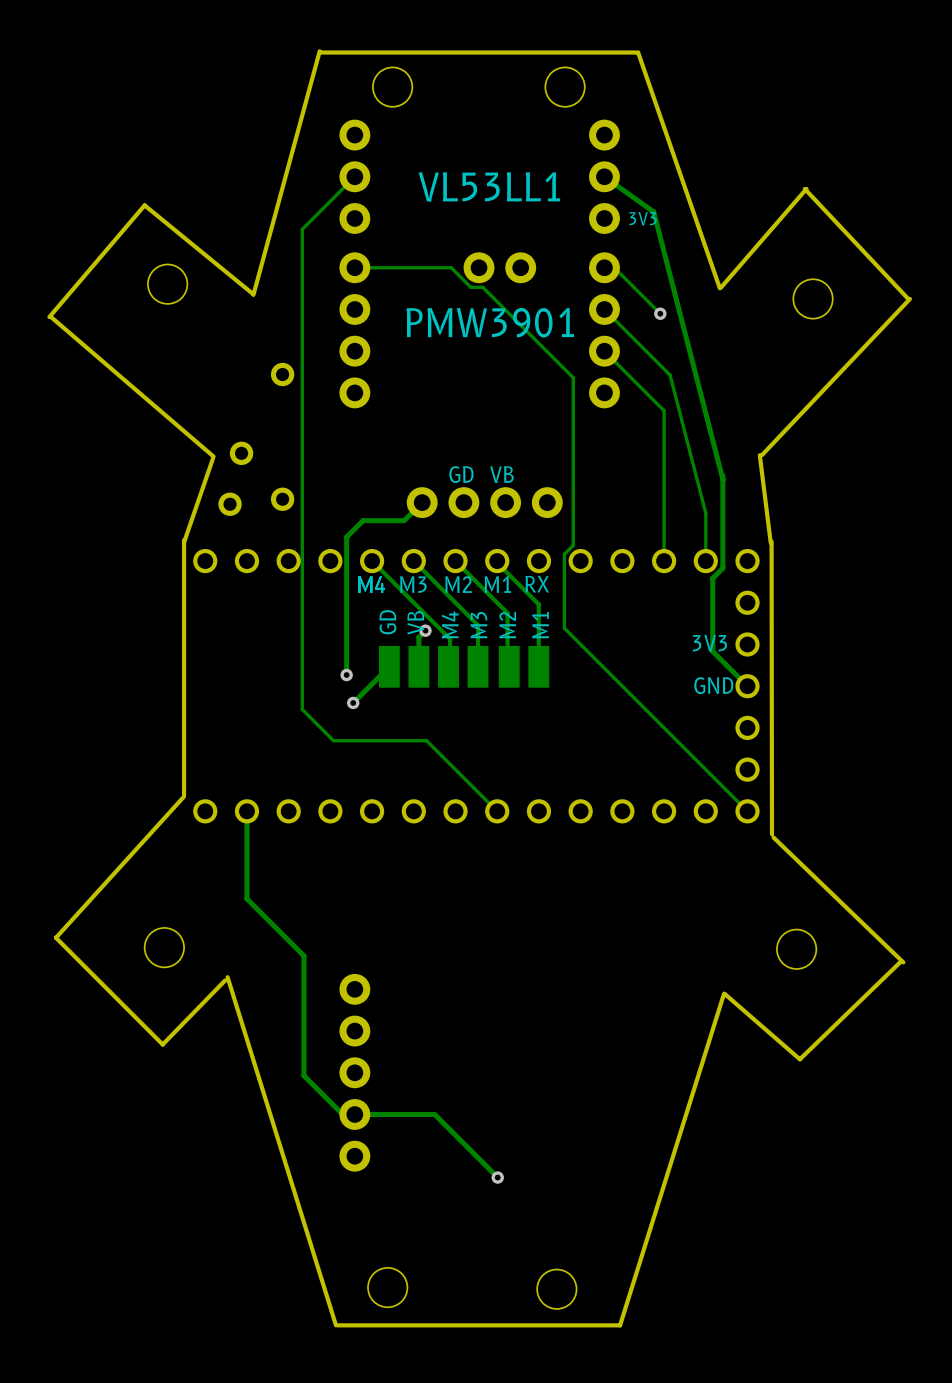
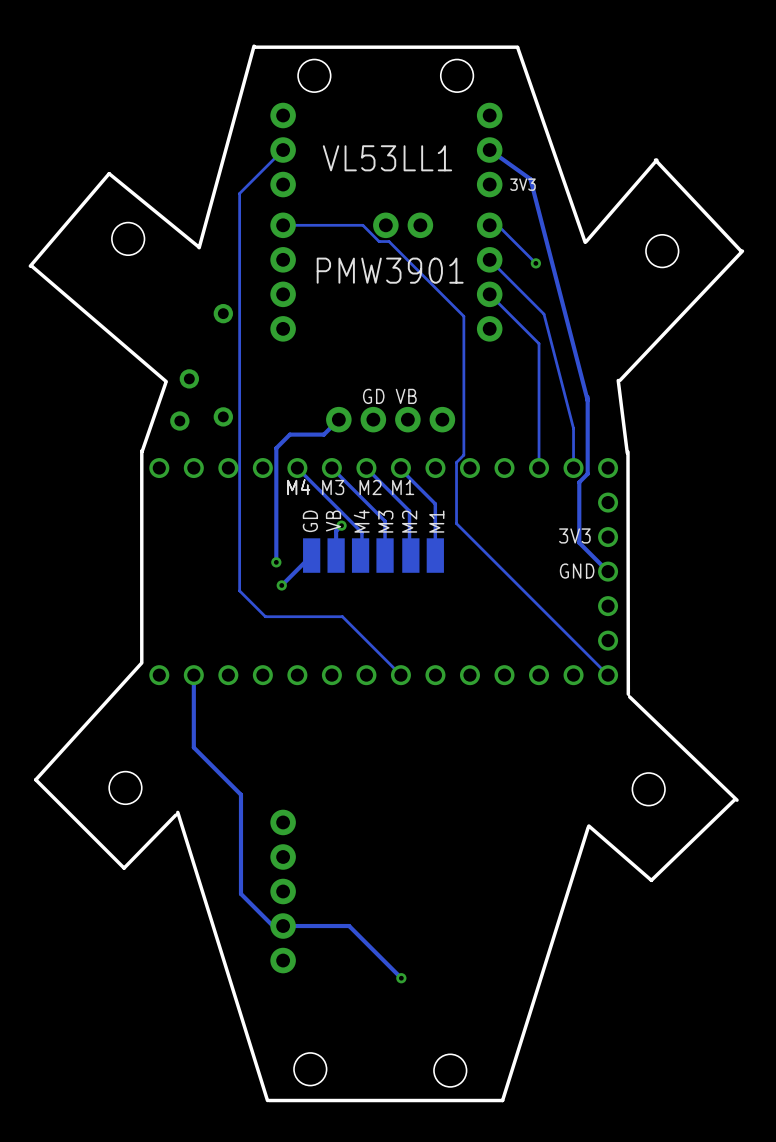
text: RX (537, 584) -> none

